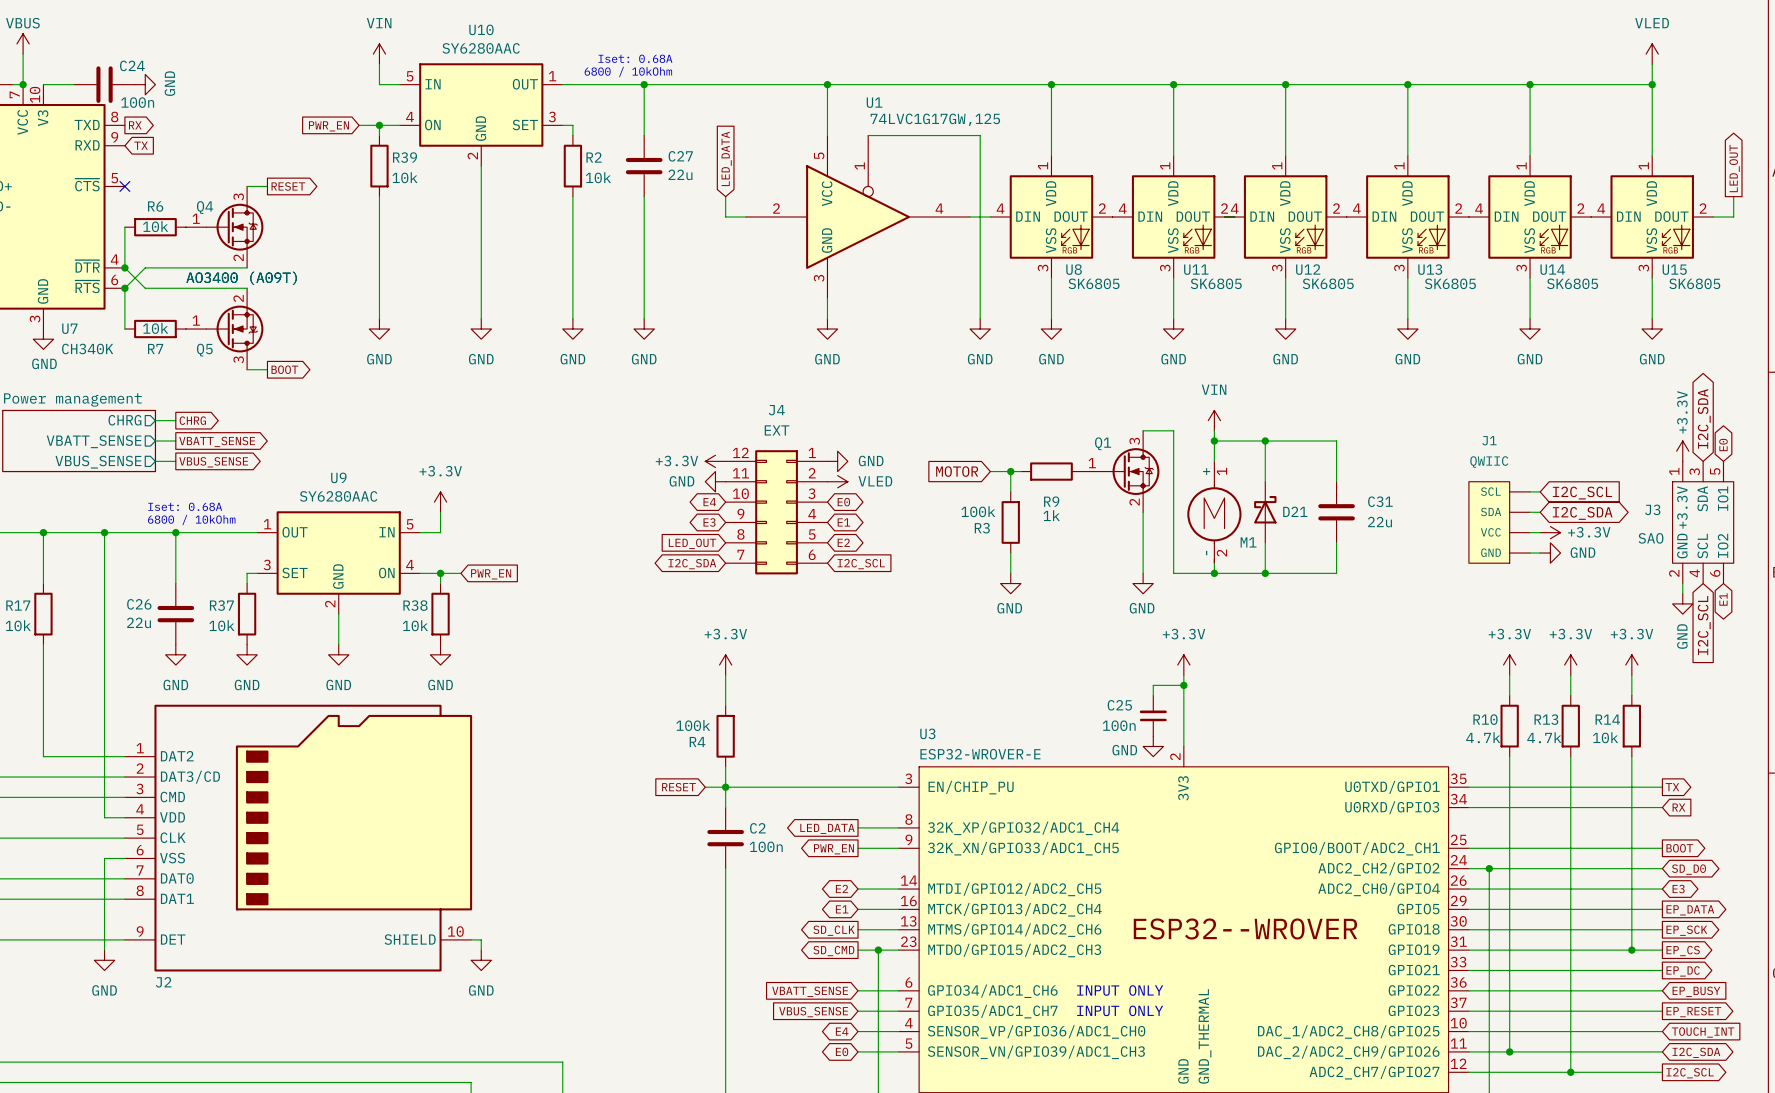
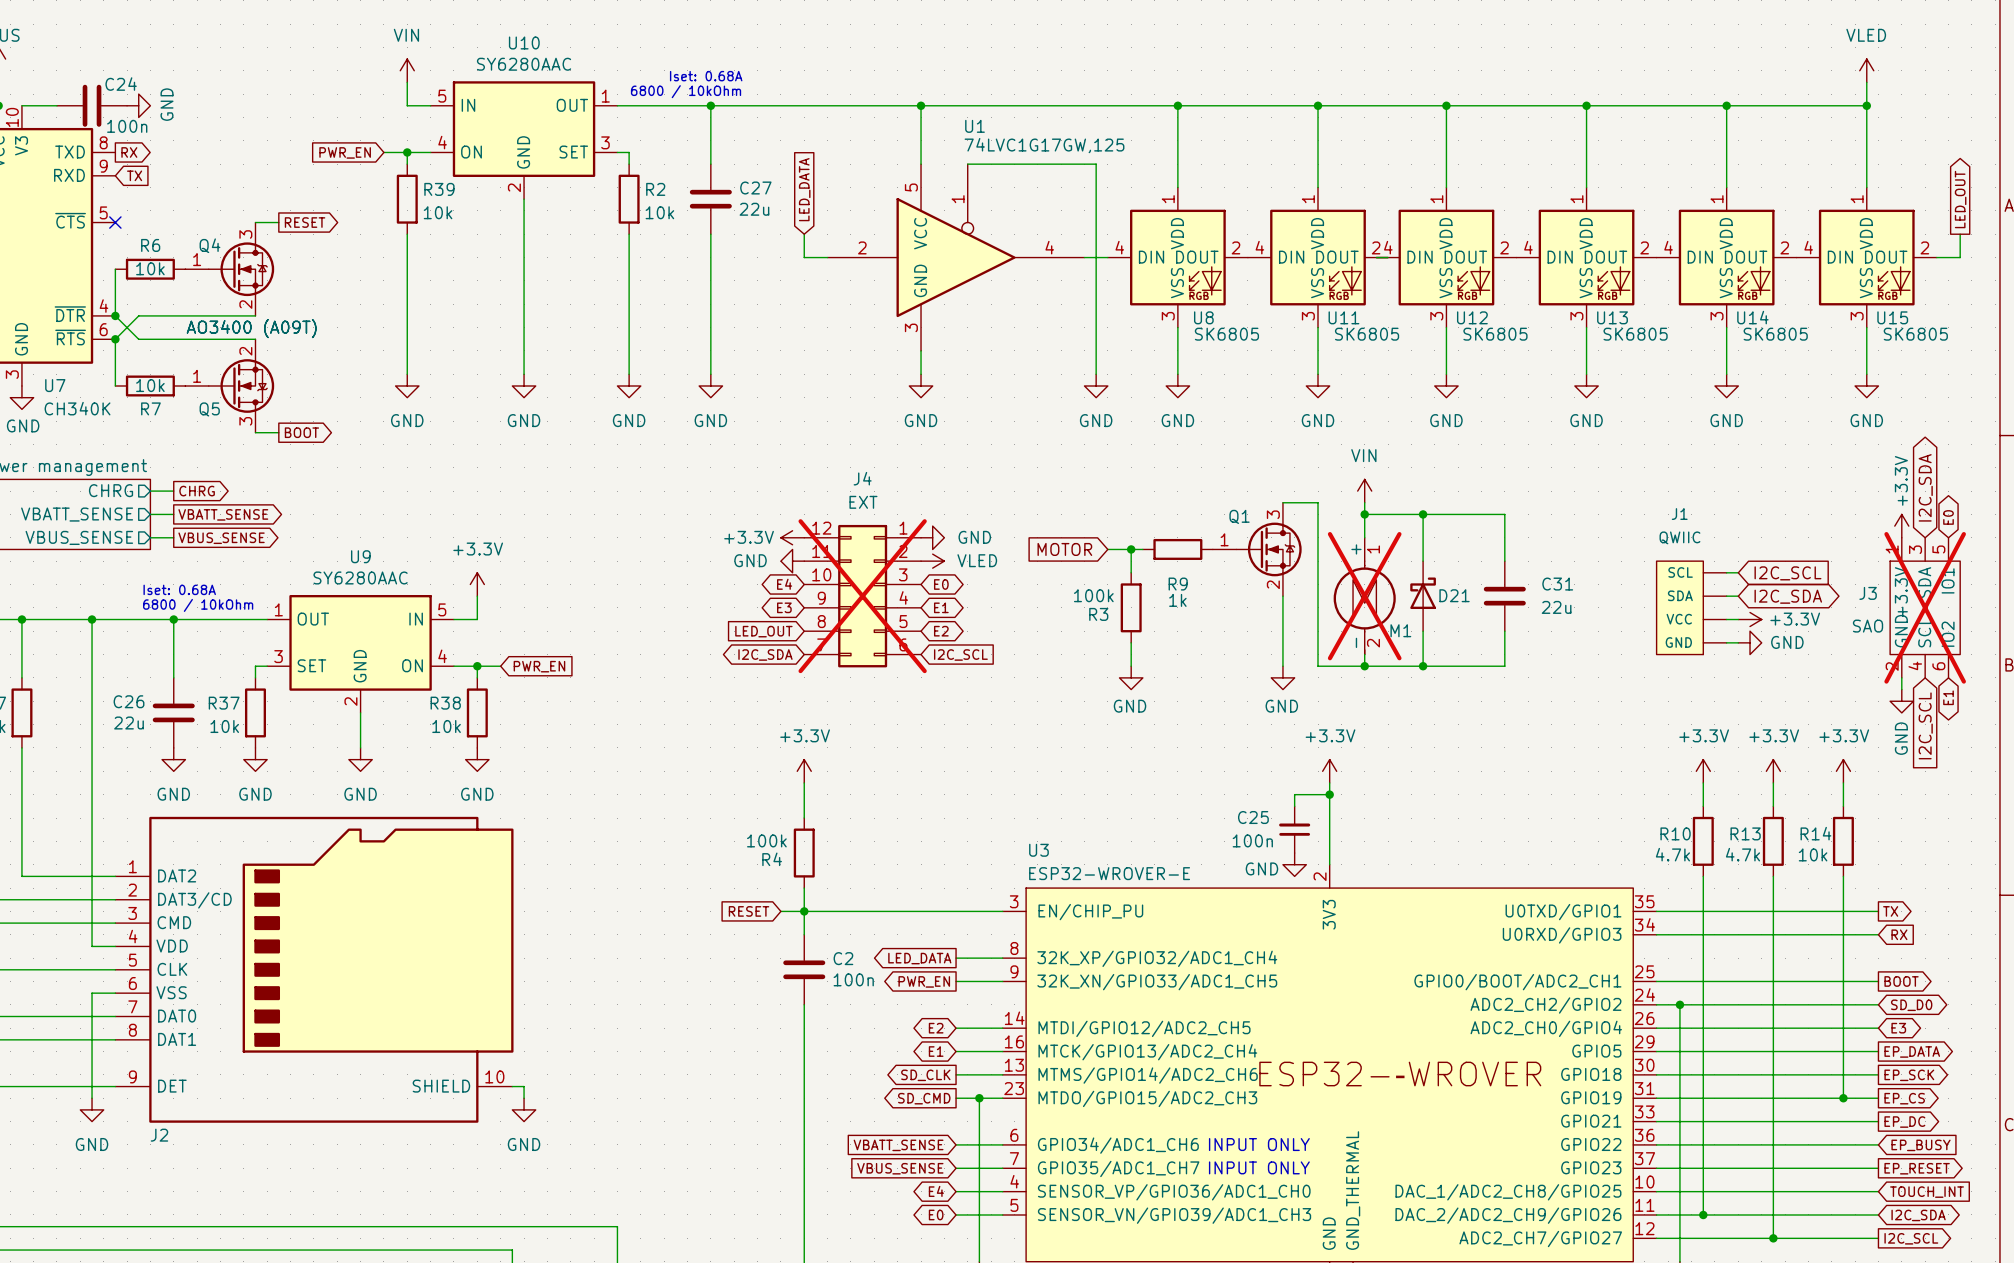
J4 do-not-place cross: none -> (862, 596)
M1 do-not-place cross: none -> (1364, 596)
J3 do-not-place cross: none -> (1925, 607)

